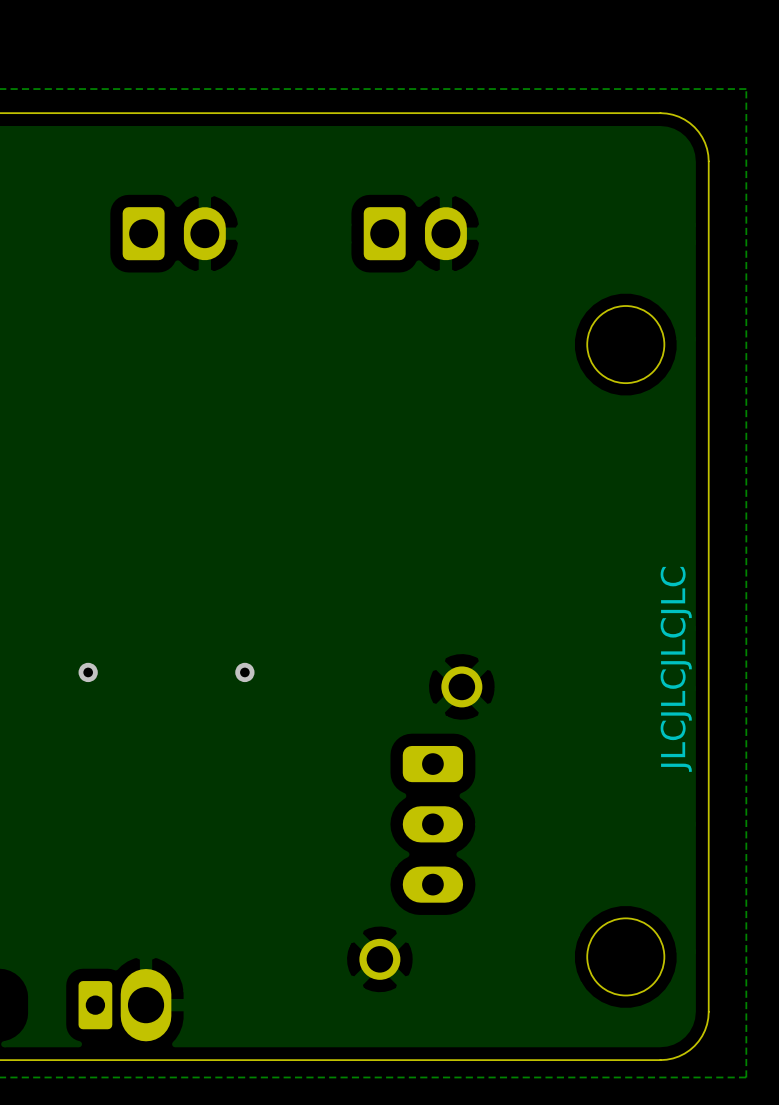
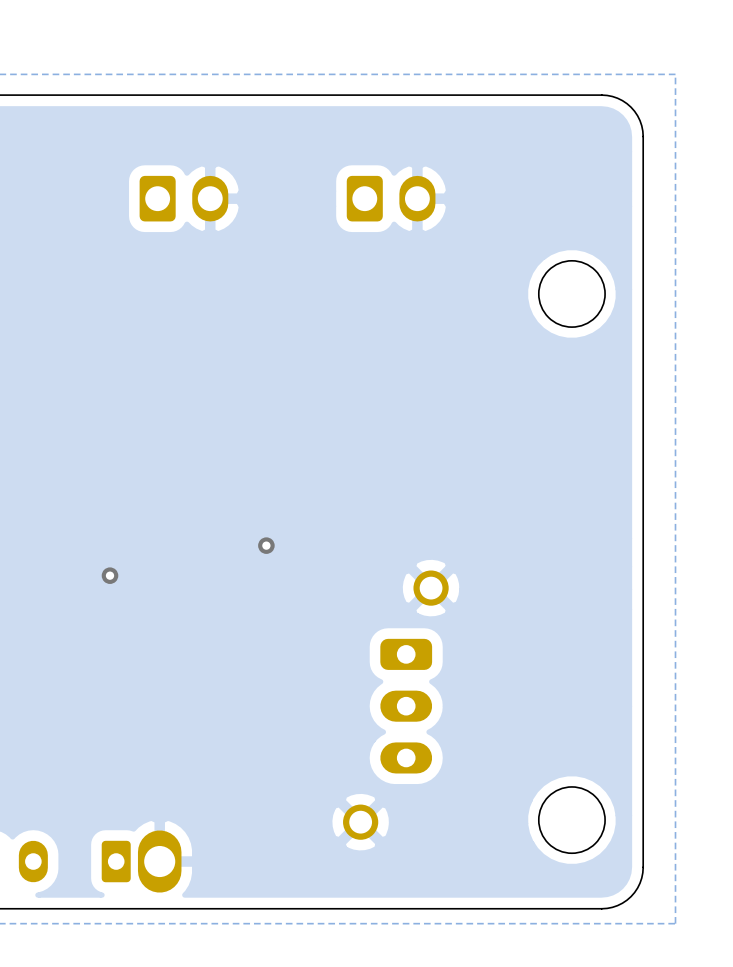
text: JLCJLCJLCJLC (676, 669) -> none
via position: (244, 672) -> (266, 545)

